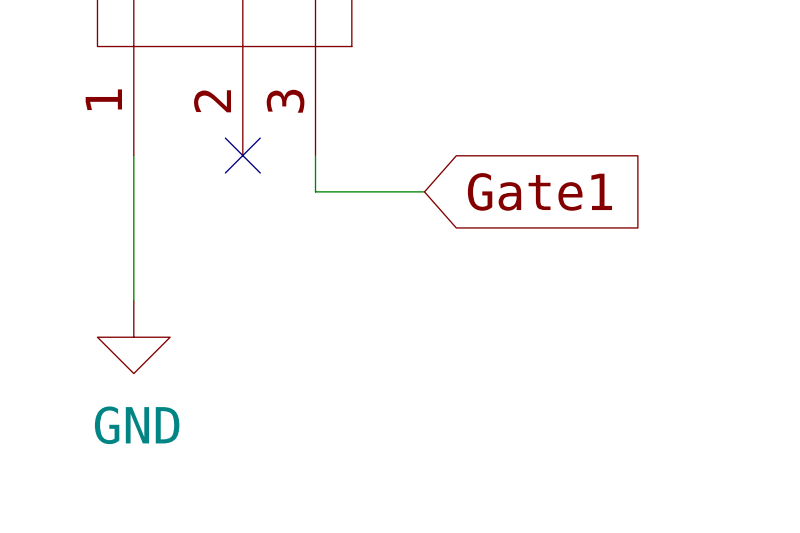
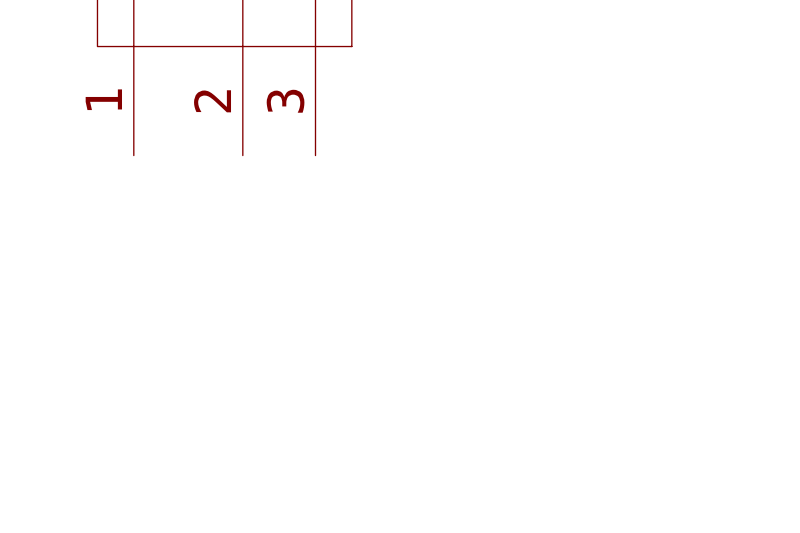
wire: (133, 155) (133, 300) -> none
no-connect mark: (242, 155) -> none
wire: (315, 155) (315, 191) (424, 191) -> none
global label: Gate1 (539, 191) -> none
power symbol: GND (133, 337) -> none

